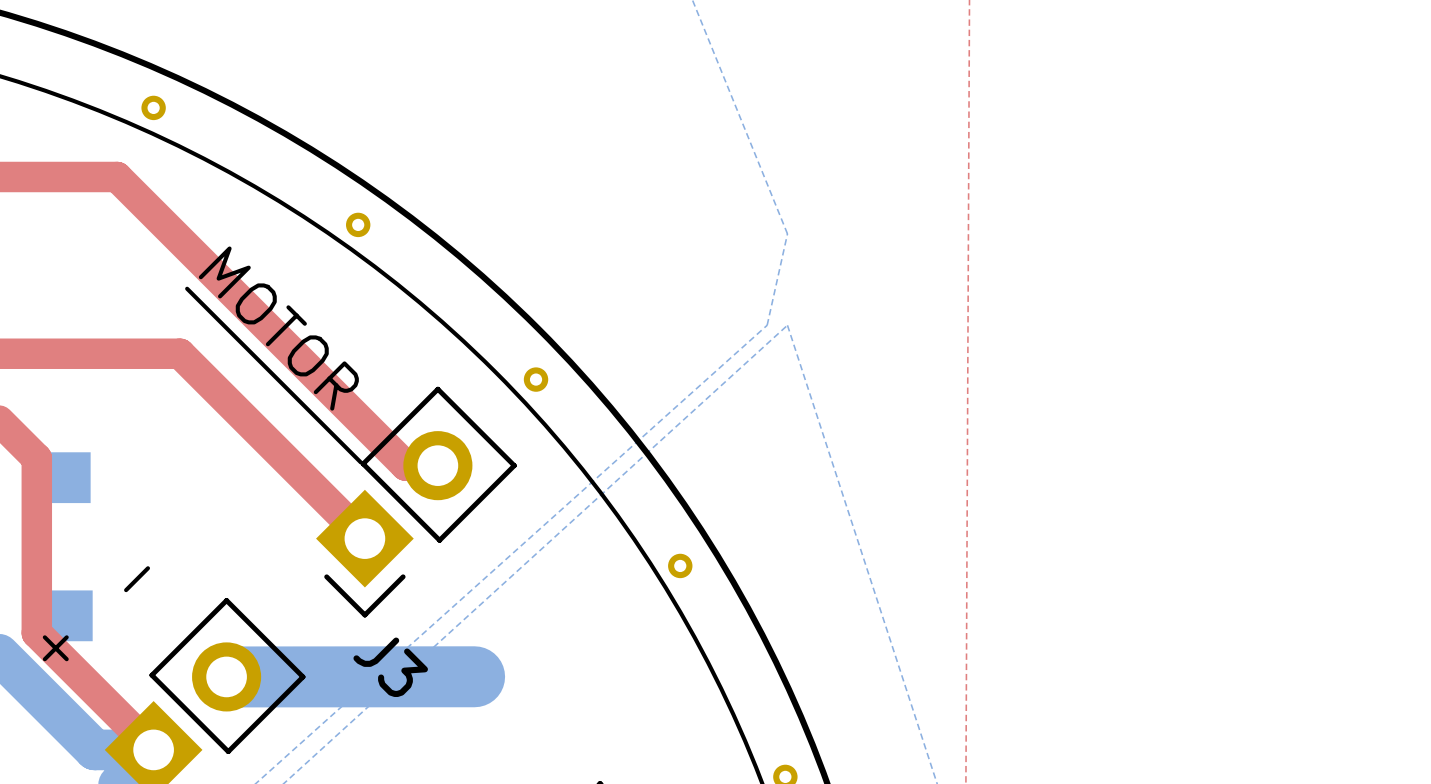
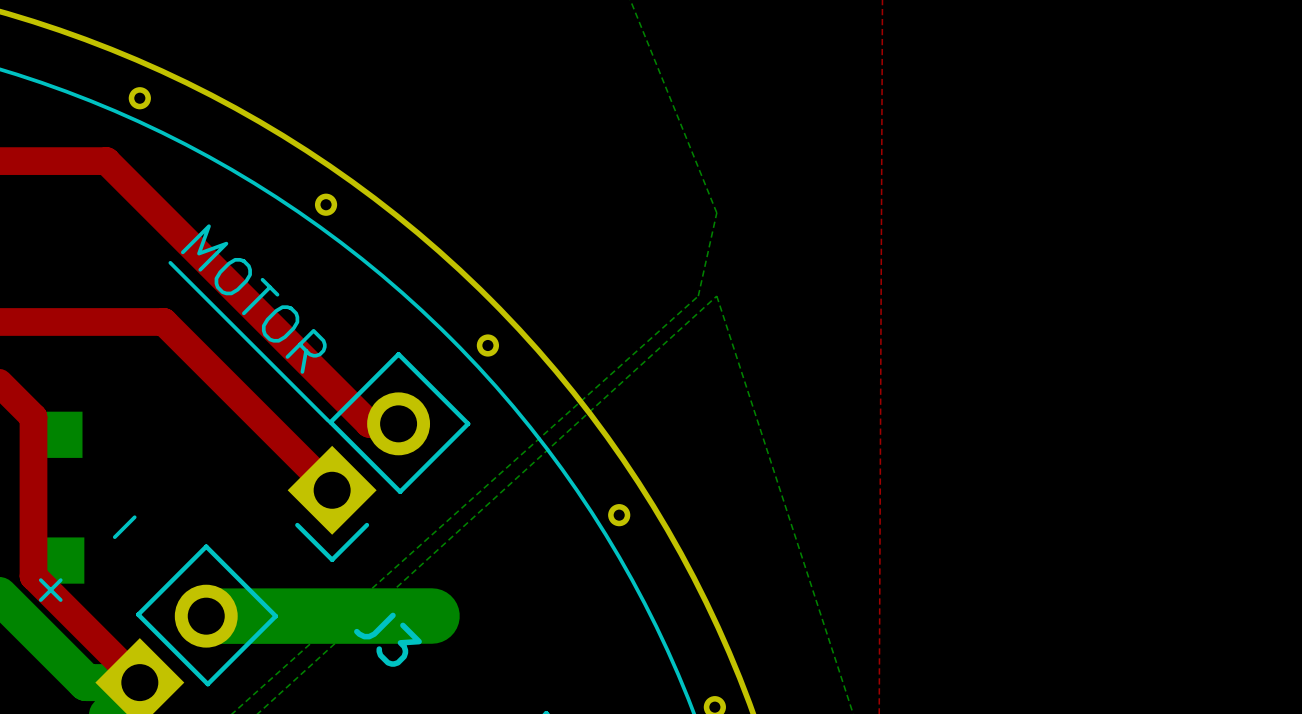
J3 name position: J3 (390, 667) -> J3 (387, 639)

